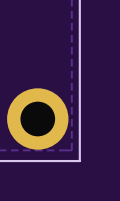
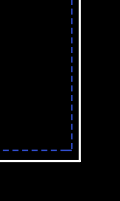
part: (37, 119) -> none

